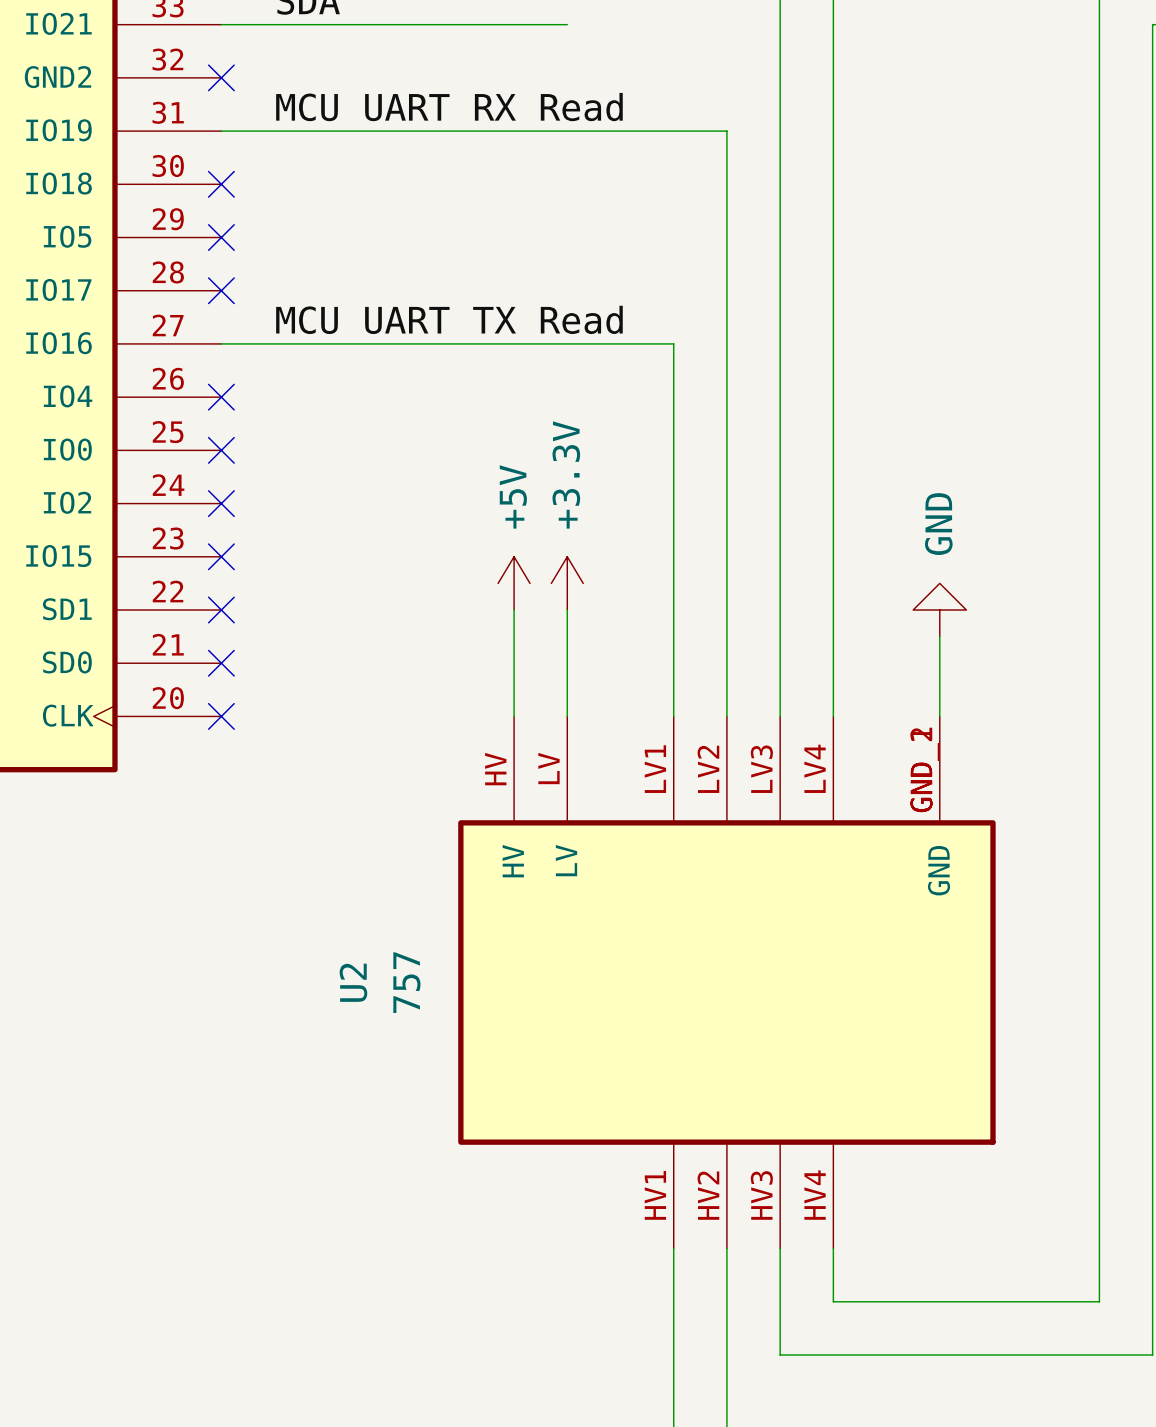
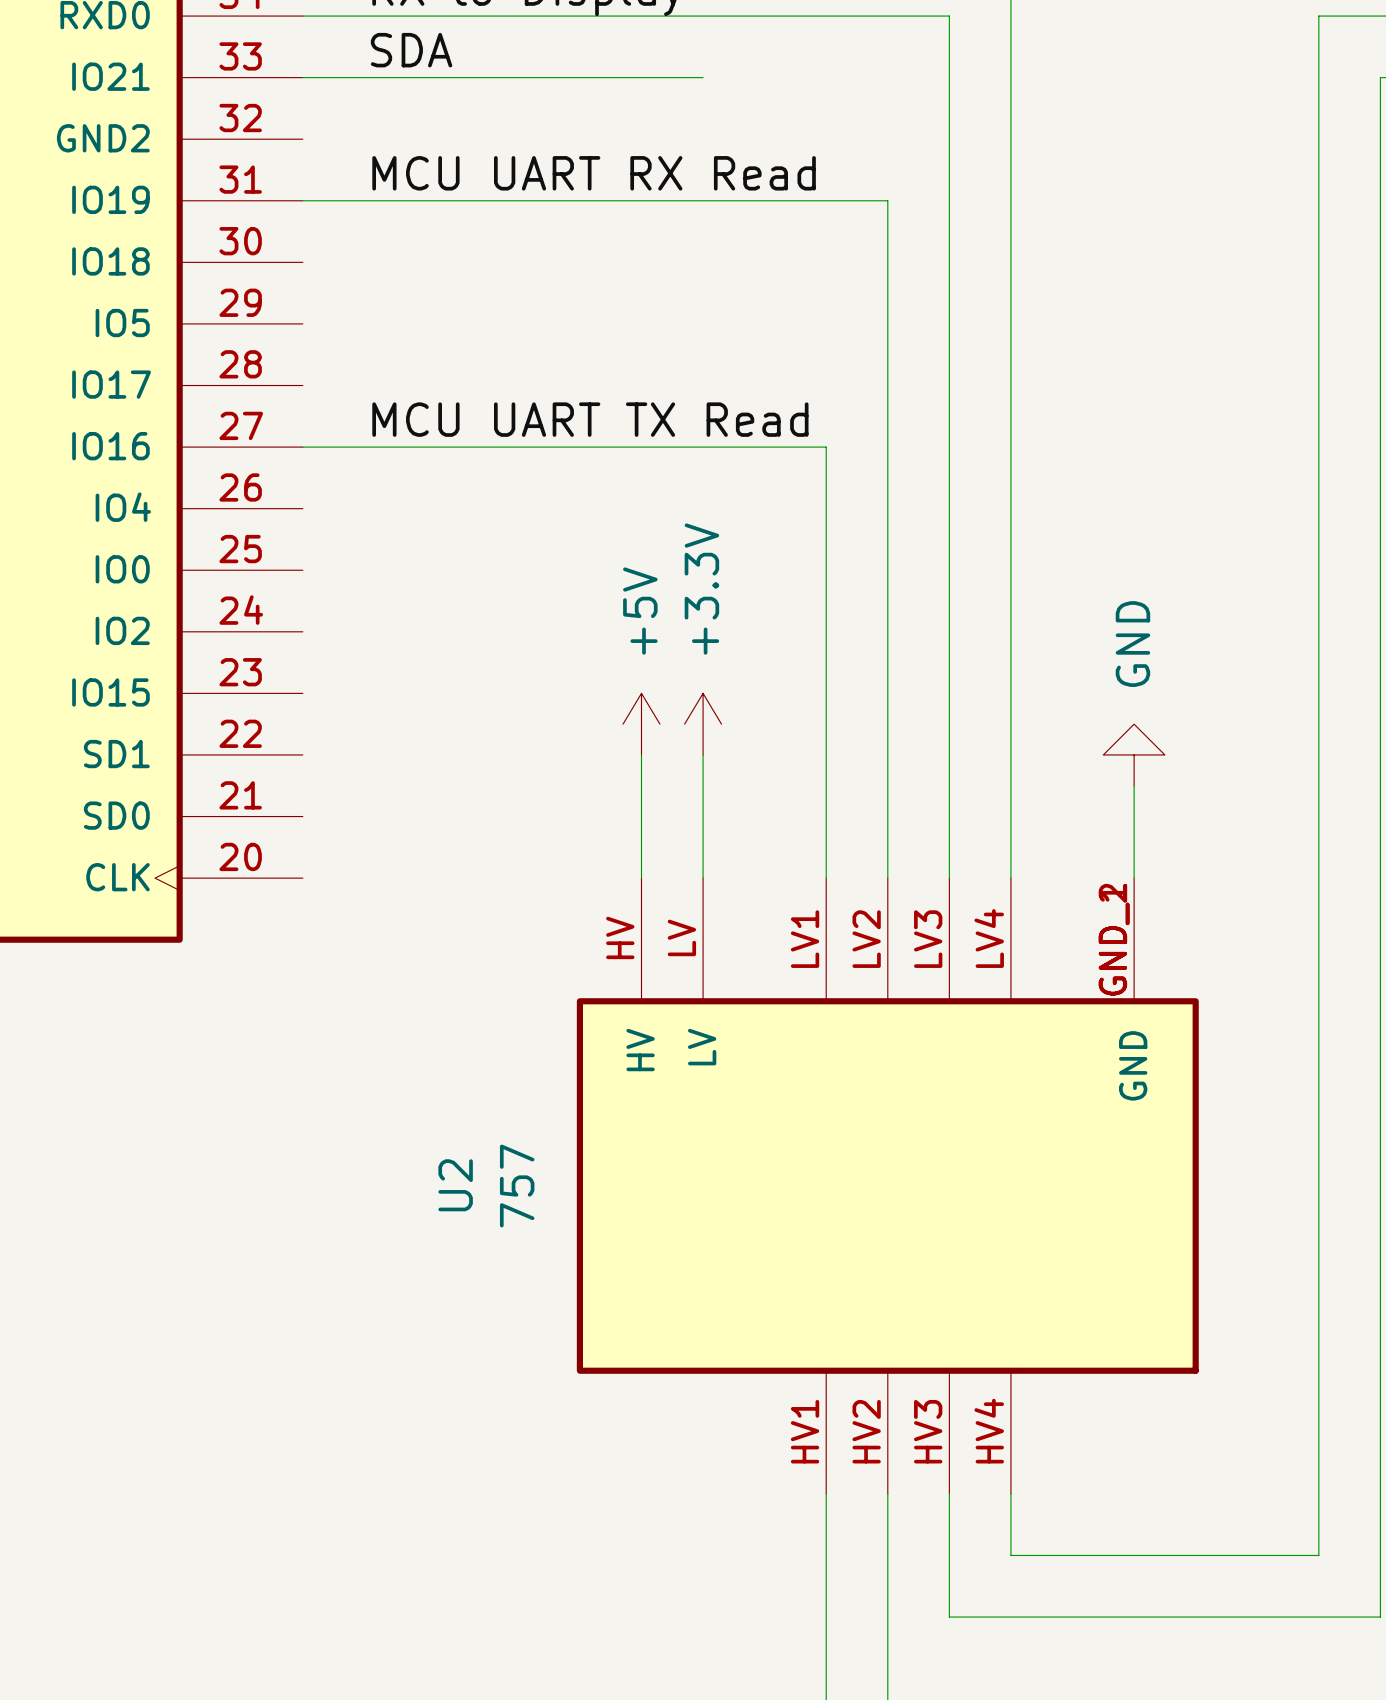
no-connect mark: (221, 77) -> none
no-connect mark: (221, 184) -> none
no-connect mark: (221, 237) -> none
no-connect mark: (221, 290) -> none
no-connect mark: (221, 397) -> none
no-connect mark: (221, 450) -> none
no-connect mark: (221, 503) -> none
no-connect mark: (221, 556) -> none
no-connect mark: (221, 610) -> none
no-connect mark: (221, 663) -> none
no-connect mark: (221, 716) -> none

